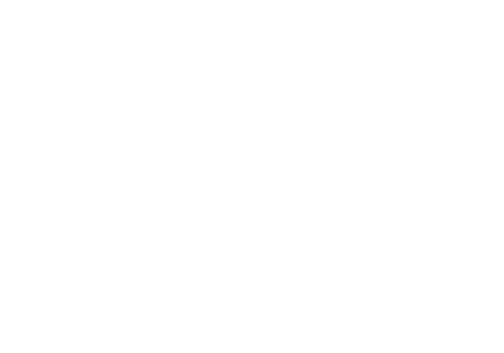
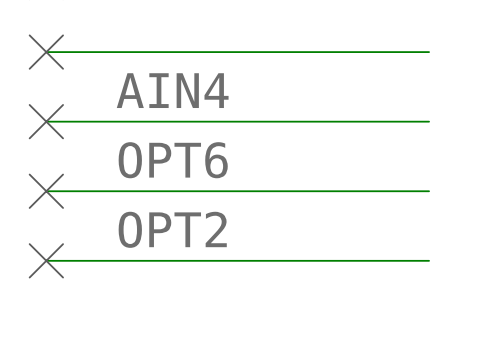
wire: none -> (46, 52) (429, 52)
no-connect mark: none -> (46, 52)
label: none -> AIN4 (172, 90)
wire: none -> (46, 121) (429, 121)
no-connect mark: none -> (46, 121)
label: none -> OPT6 (173, 160)
wire: none -> (46, 191) (429, 191)
no-connect mark: none -> (46, 191)
label: none -> OPT2 (172, 229)
wire: none -> (46, 260) (429, 260)
no-connect mark: none -> (46, 260)

